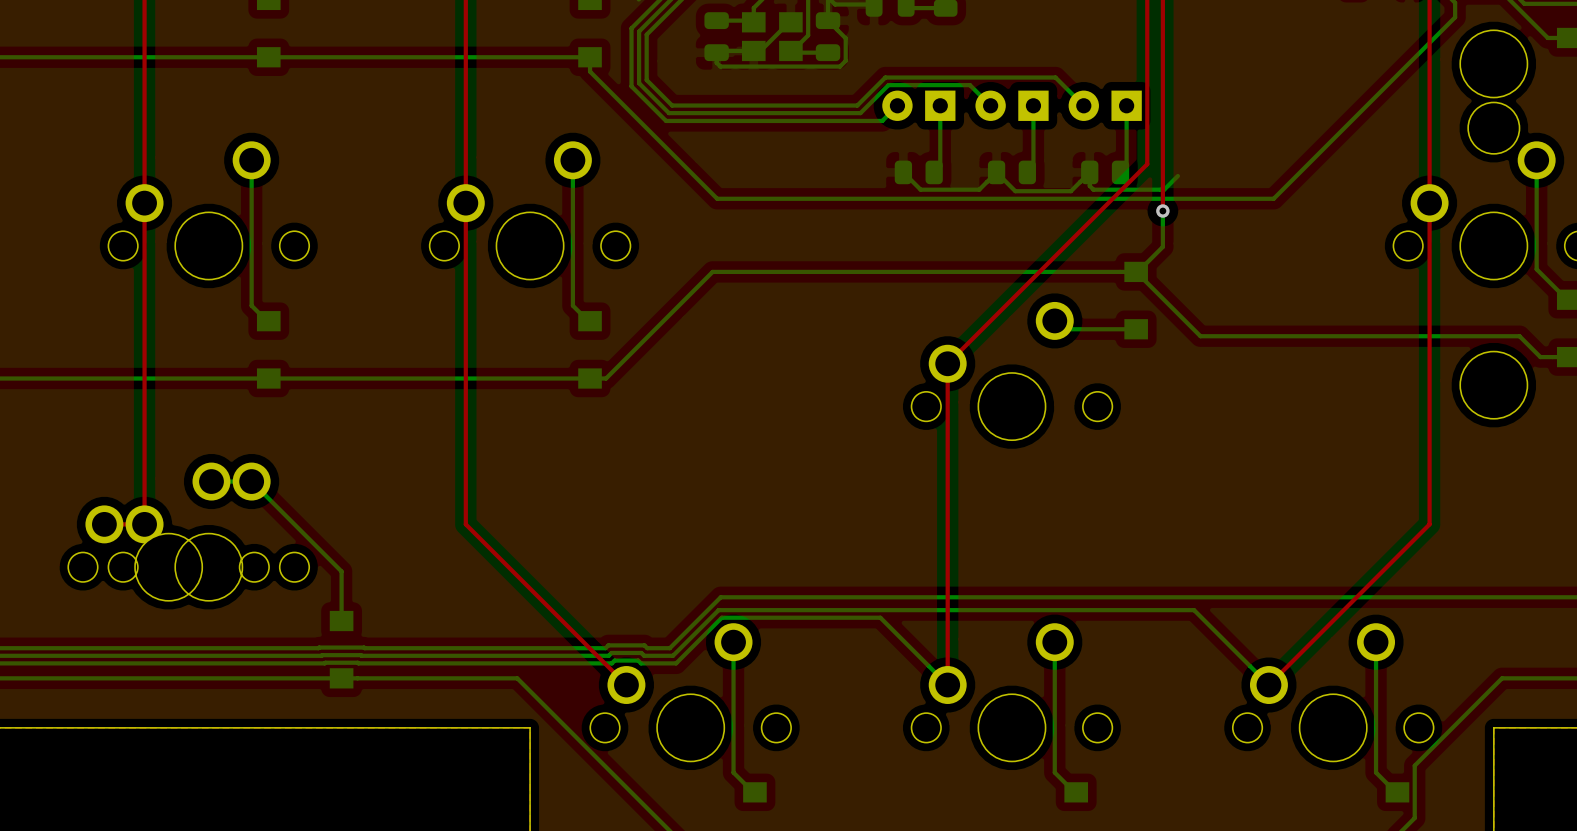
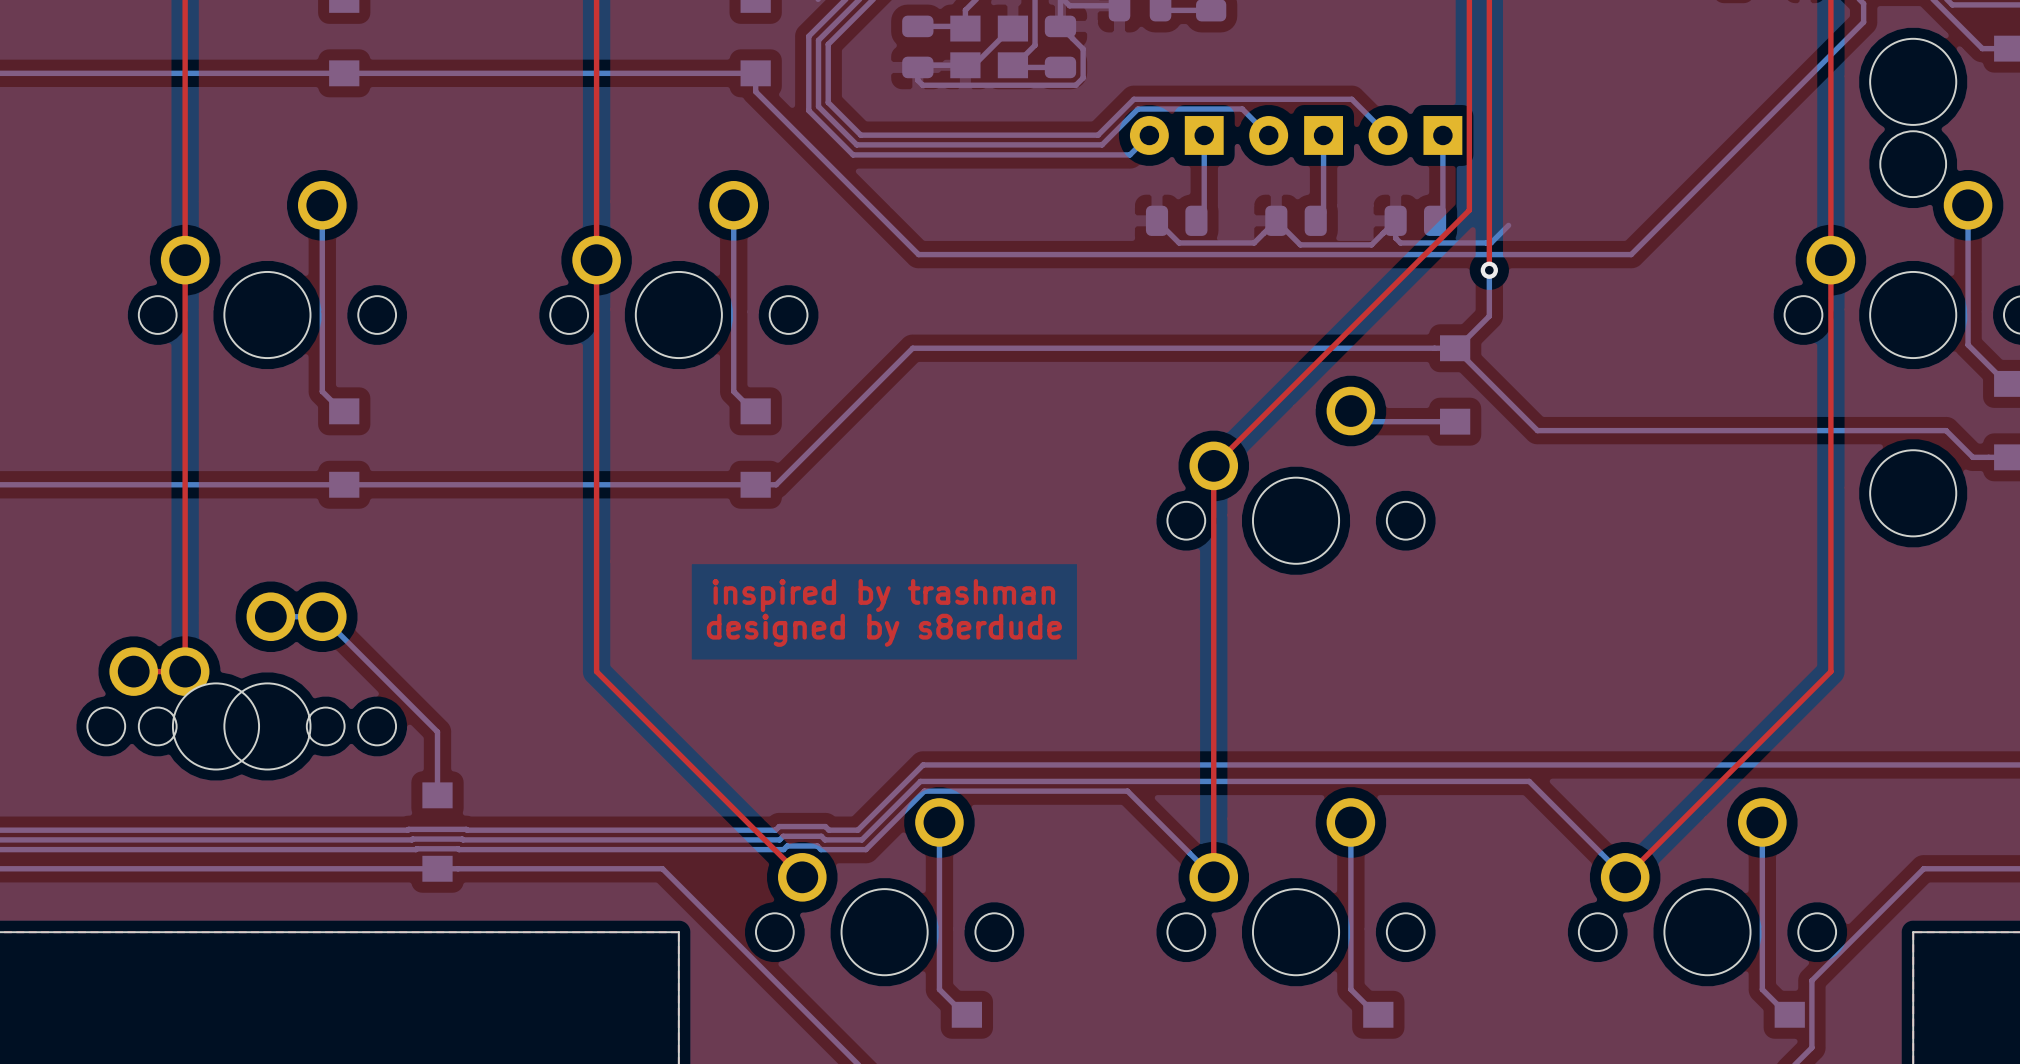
text: none -> inspired by trashman (883, 595)
text: none -> designed by s8erdude (884, 630)

